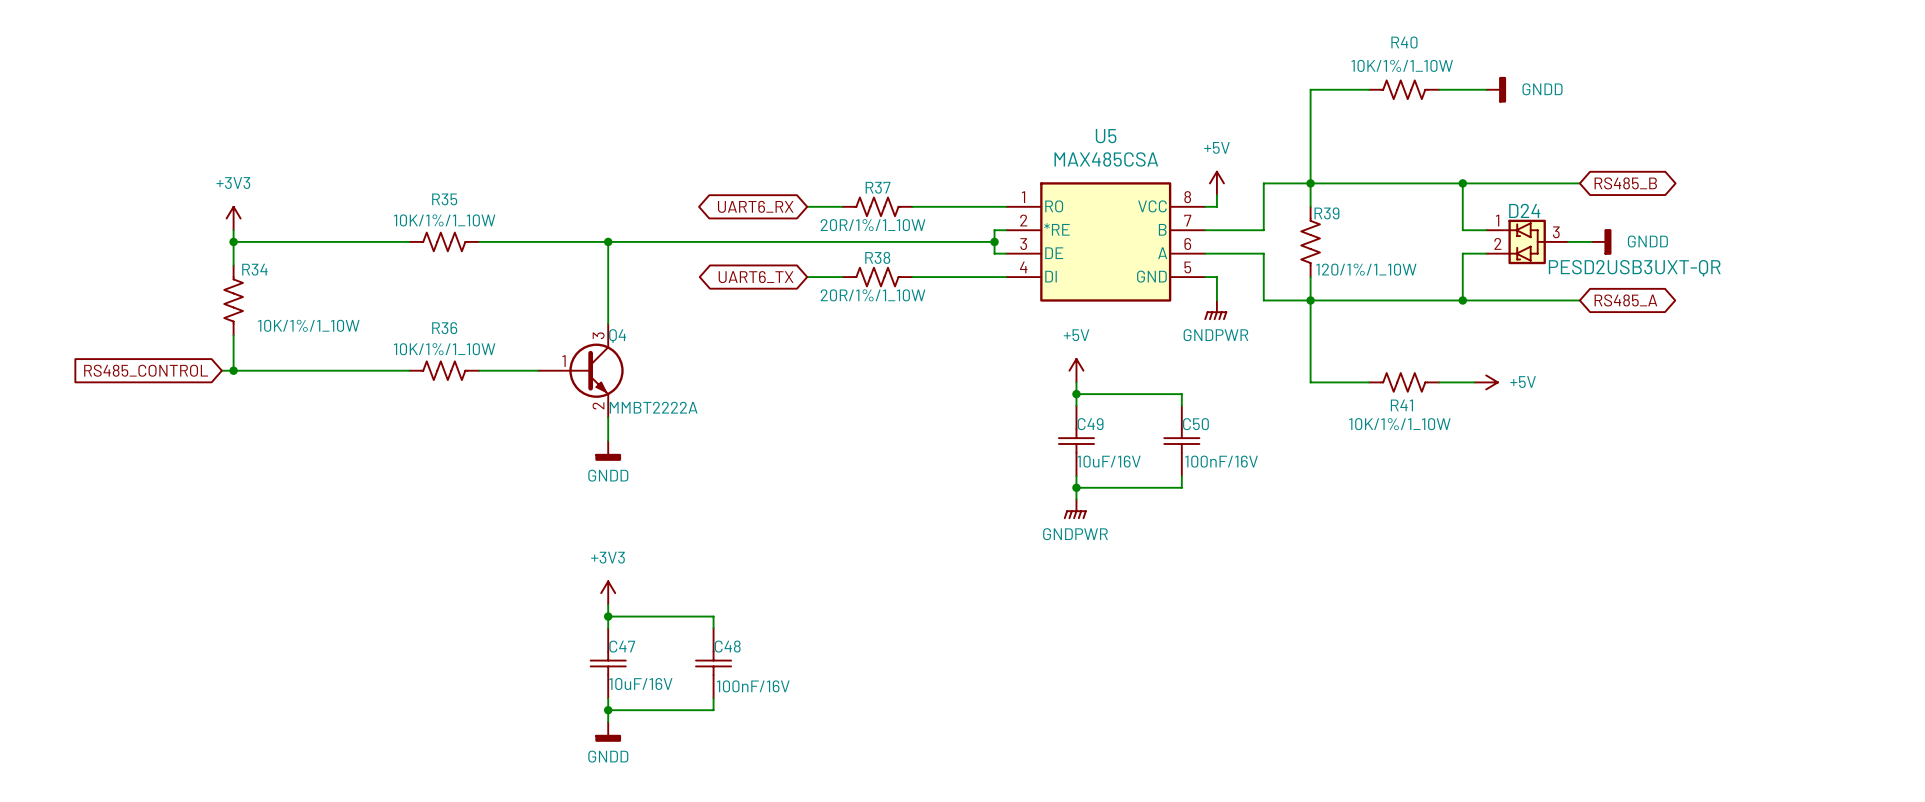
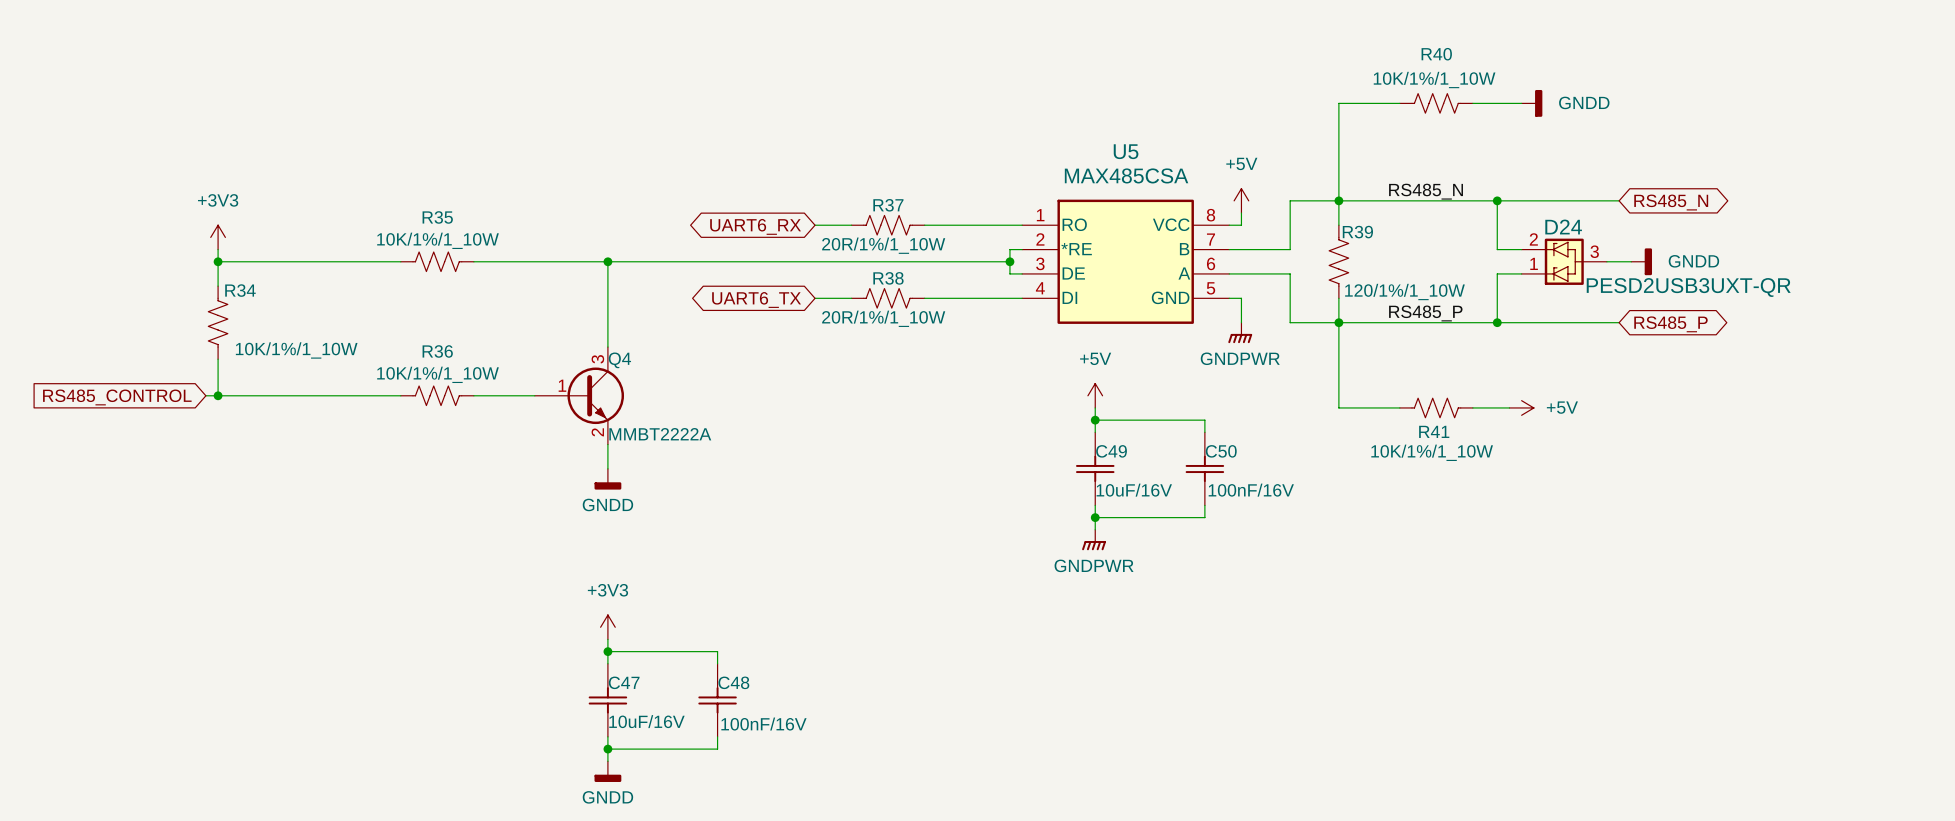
label: none -> RS485_N (1426, 191)
global label: RS485_B (1625, 183) -> RS485_N (1671, 202)
D24 flip: as is (1527, 241) -> up-down (1564, 261)
label: none -> RS485_P (1425, 313)
global label: RS485_A (1625, 300) -> RS485_P (1670, 324)

